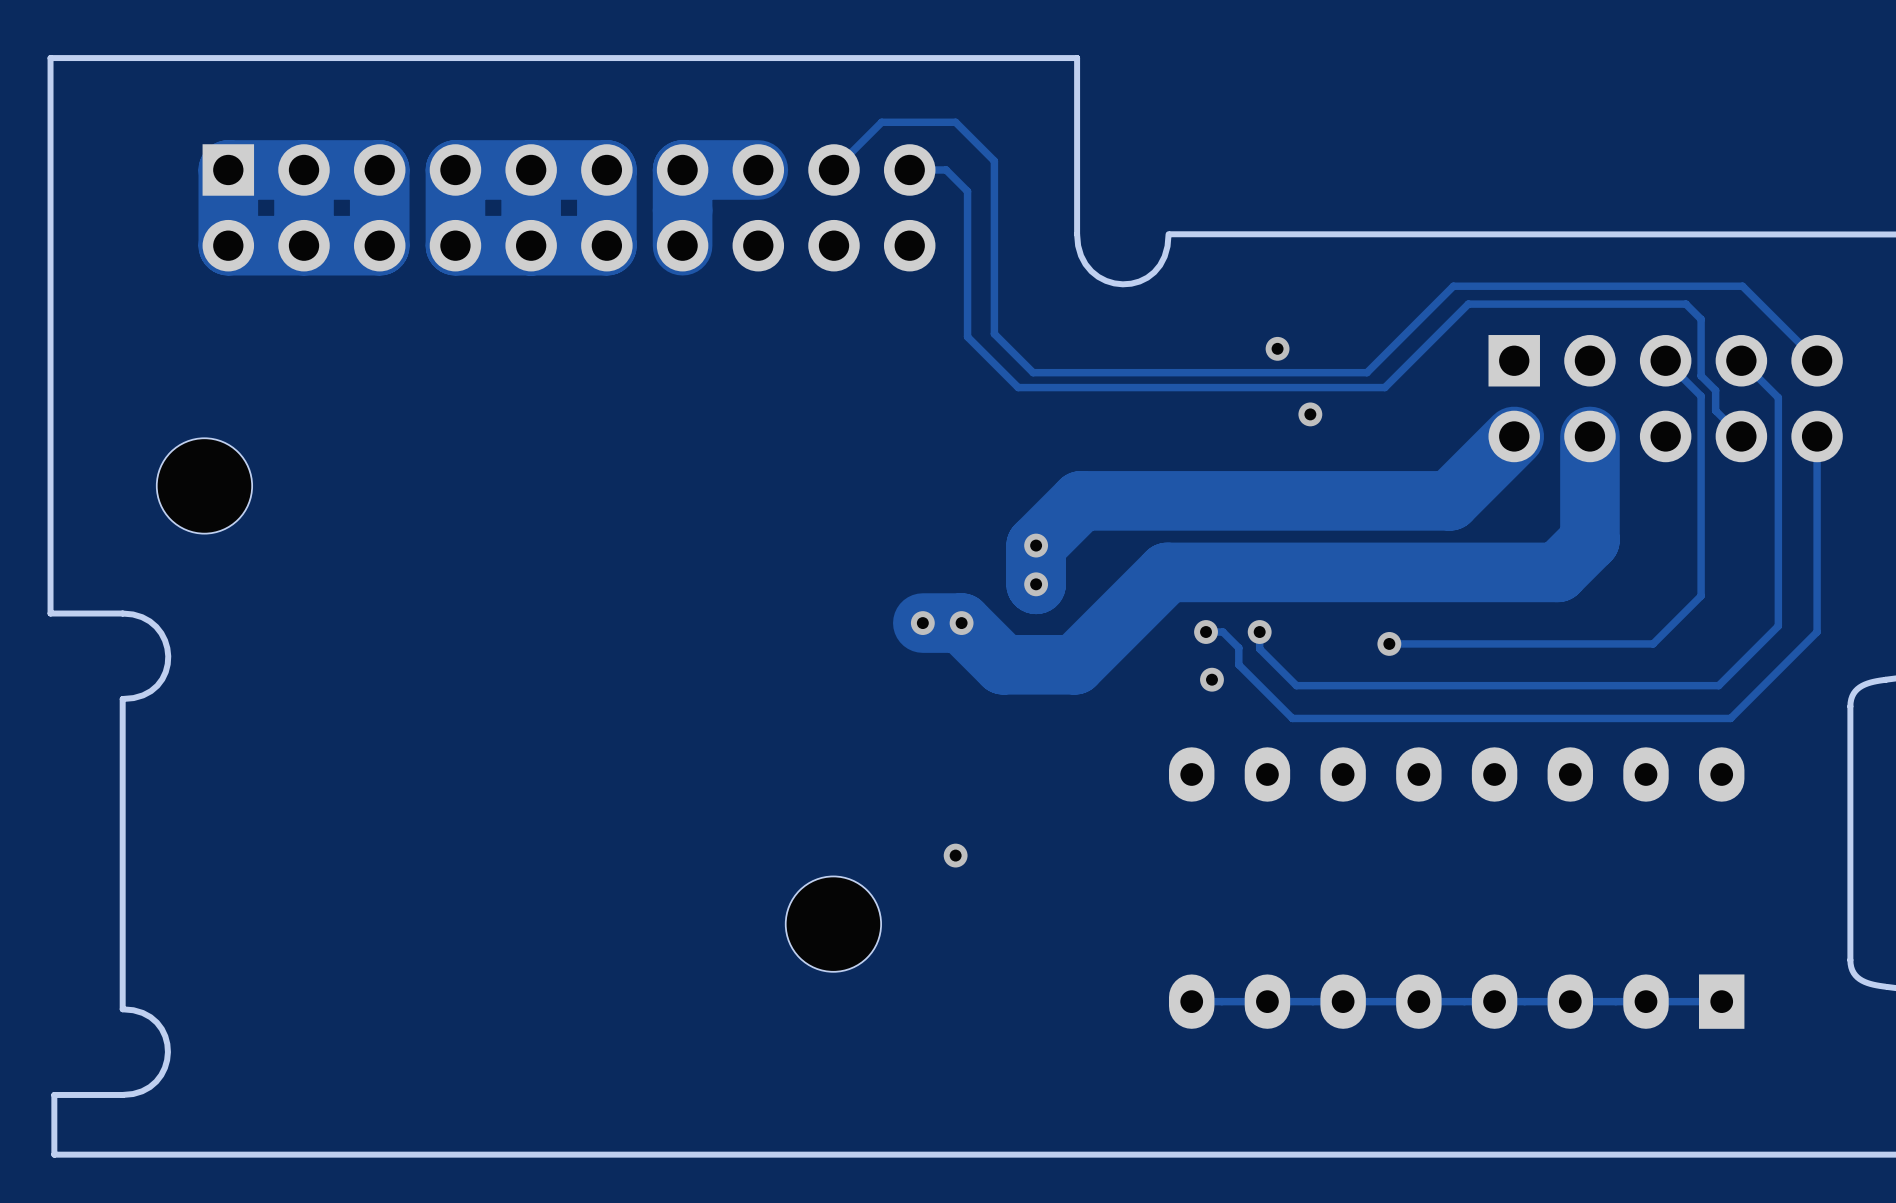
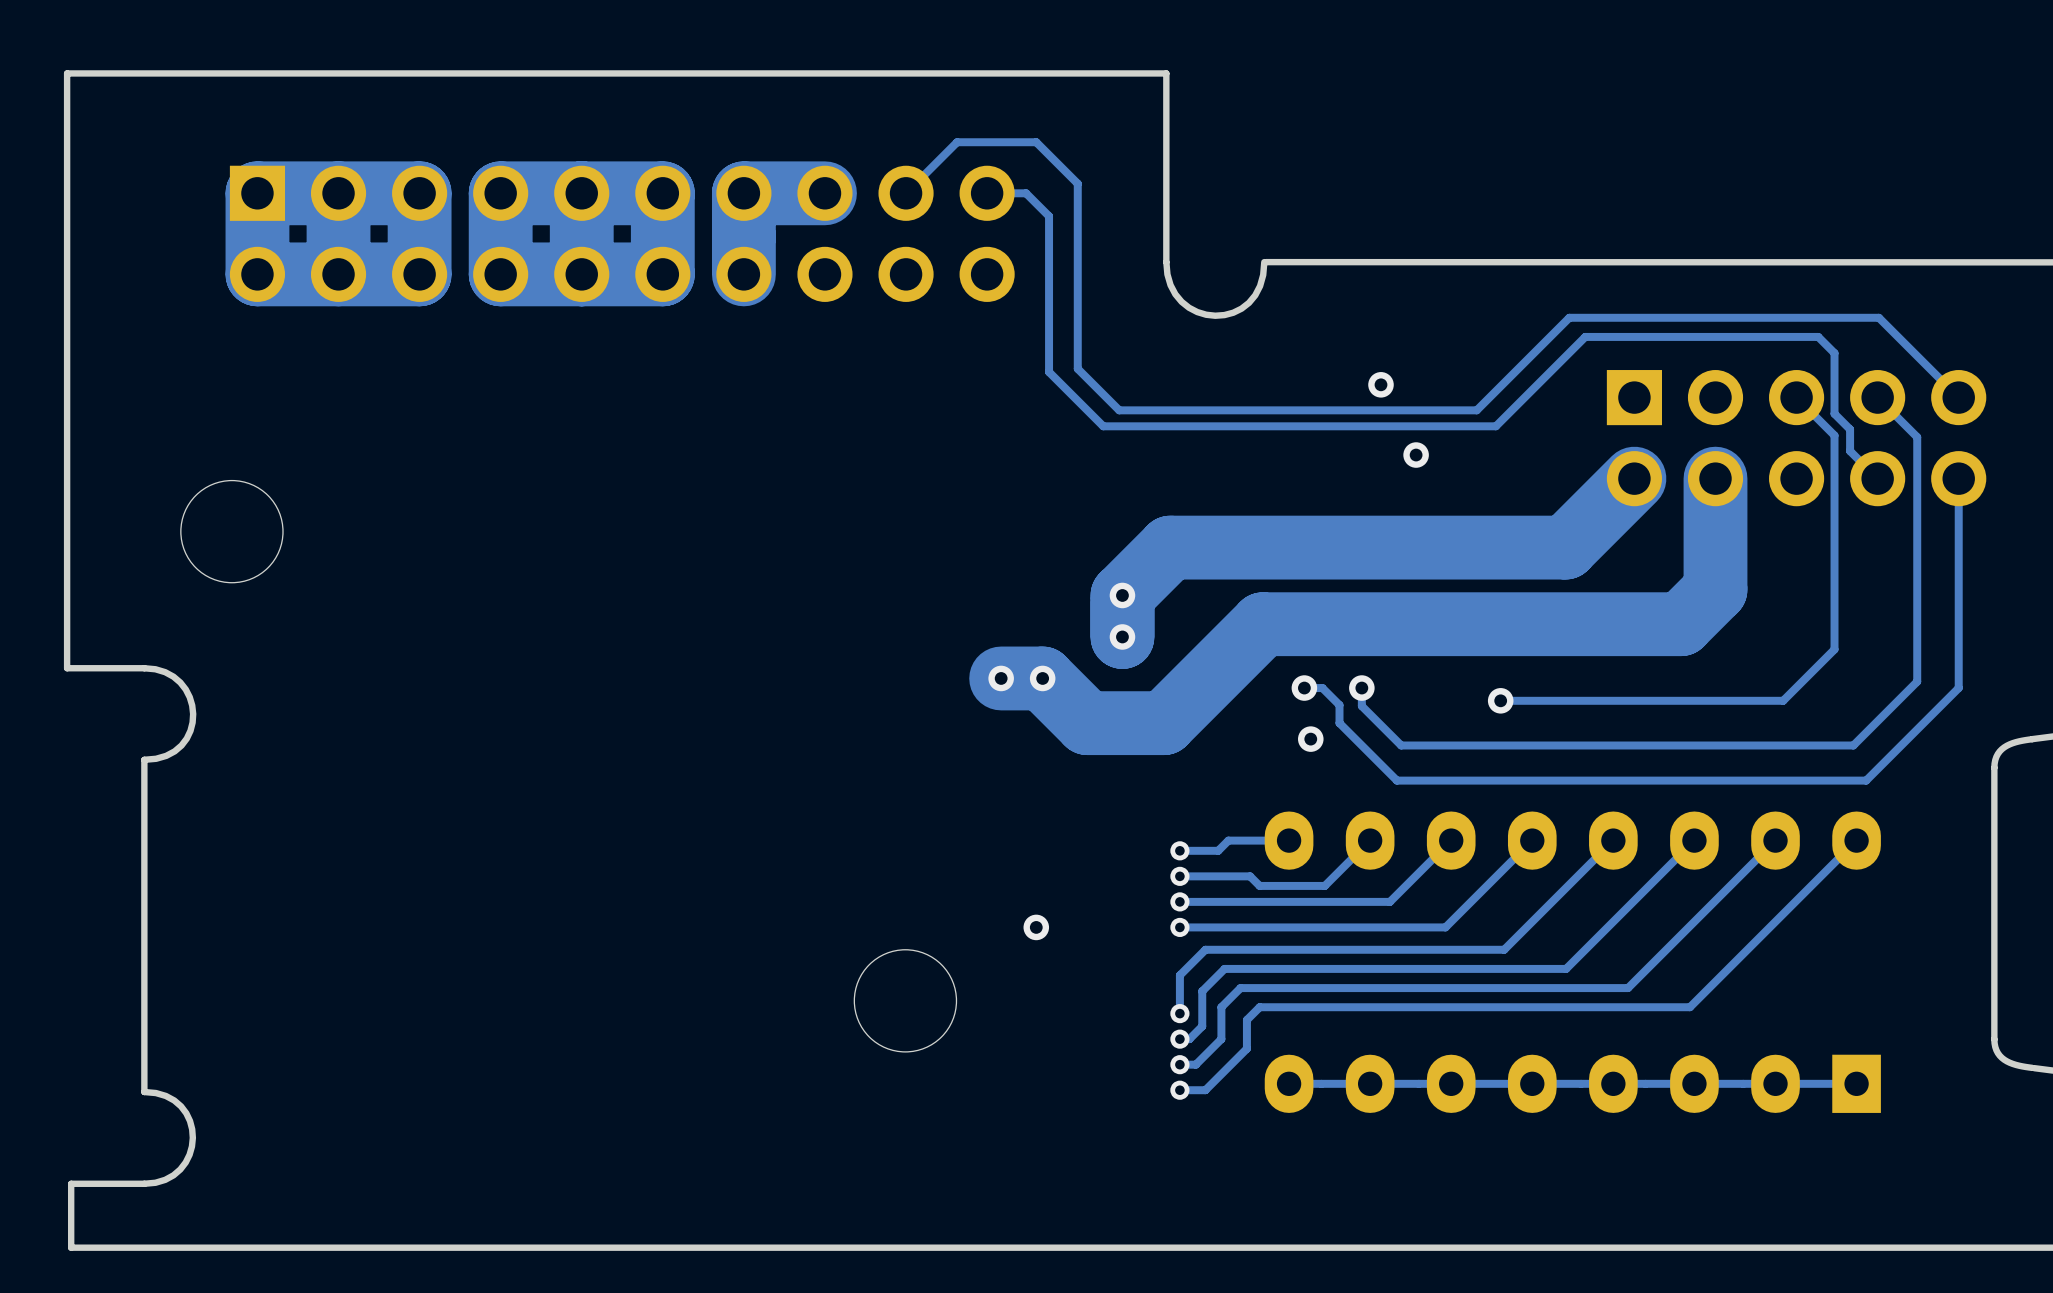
track: none -> (1289, 840) (1228, 840) (1218, 850) (1179, 850)
track: none -> (1370, 840) (1324, 885) (1259, 885) (1250, 876) (1179, 876)
track: none -> (1451, 840) (1389, 901) (1179, 901)
track: none -> (1532, 840) (1445, 927) (1179, 927)
track: none -> (1613, 840) (1504, 949) (1205, 949) (1179, 975) (1179, 1013)
track: none -> (1694, 840) (1566, 968) (1224, 968) (1202, 991) (1202, 1026) (1189, 1039) (1179, 1039)
track: none -> (1775, 840) (1628, 988) (1240, 988) (1221, 1007) (1221, 1039) (1195, 1064) (1179, 1064)
track: none -> (1856, 840) (1689, 1007) (1259, 1007) (1246, 1019) (1246, 1048) (1205, 1090) (1179, 1090)
via: none -> (1179, 850)
via: none -> (1179, 876)
via: none -> (1179, 901)
via: none -> (1179, 927)
via: none -> (1179, 1013)
via: none -> (1179, 1039)
via: none -> (1179, 1064)
via: none -> (1179, 1090)

